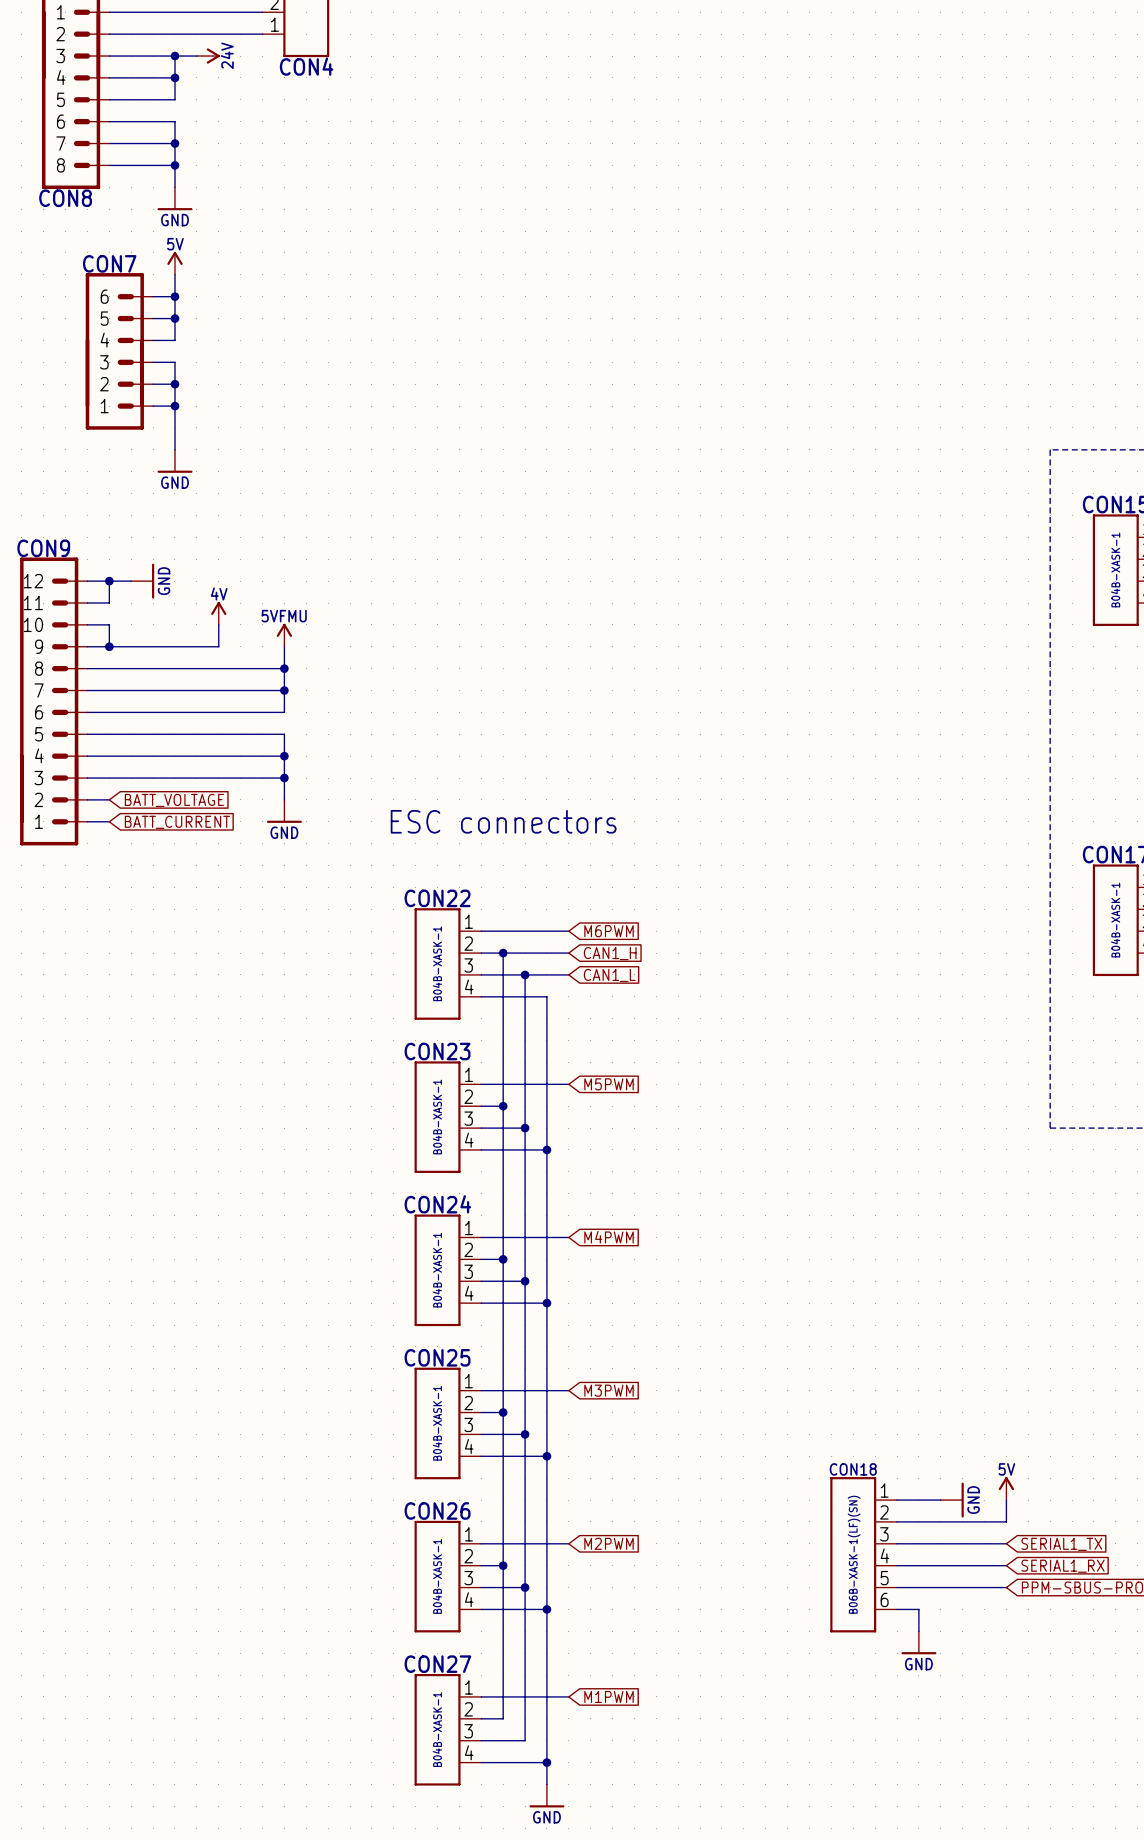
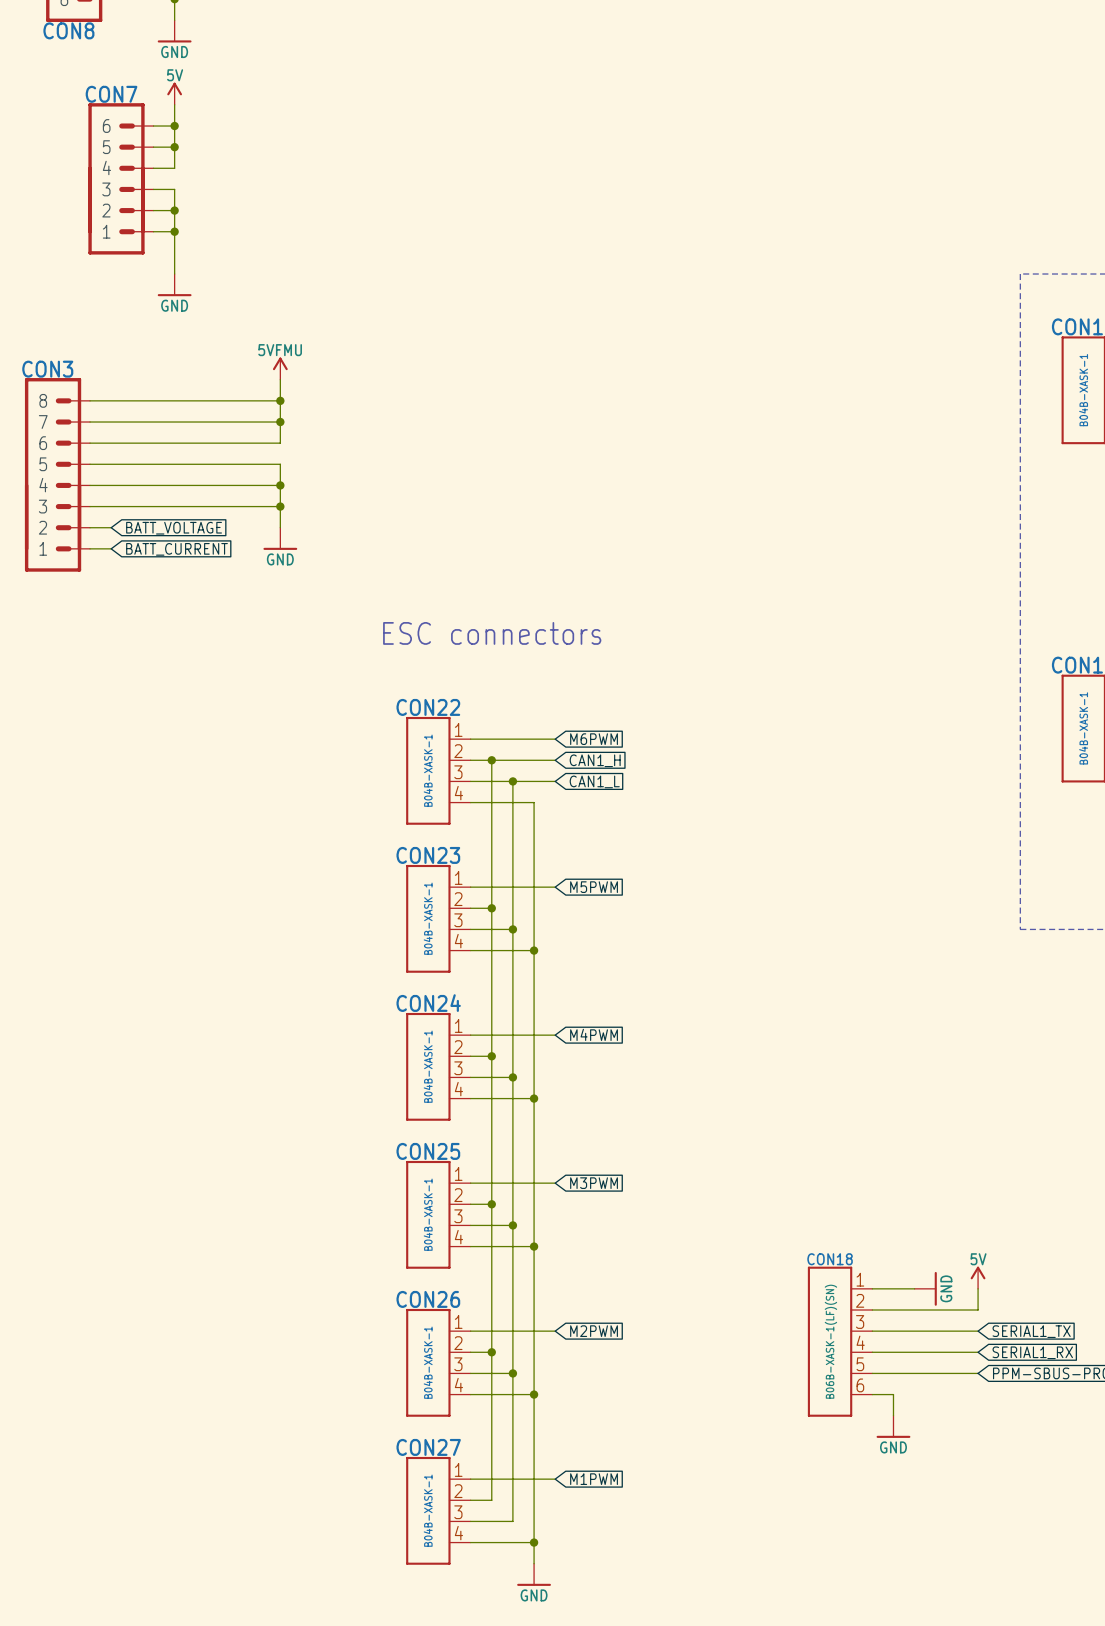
wire: (109, 581) (109, 603) -> (280, 422) (111, 422)
junction: (109, 581) -> none
wire: none -> (132, 400) (280, 400)
power symbol: GND (142, 581) -> none
junction: none -> (280, 400)
junction: none -> (280, 422)
power symbol: 4V (218, 613) -> none
wire: (109, 624) (109, 646) -> (111, 443) (280, 443) (280, 379)
wire: (218, 624) (218, 646) -> (280, 464) (216, 464)
power symbol position: 5VFMU (284, 635) -> 5VFMU (280, 368)
junction: (109, 646) -> none
CON3: none -> (57, 474)
CON9: (53, 701) -> none
wire: (109, 712) (284, 712) -> none
wire: (109, 734) (284, 734) (284, 799) -> none
wire: (87, 756) (284, 756) -> none
junction: (284, 756) -> none
wire: (87, 778) (284, 778) -> none
junction: (284, 778) -> none
wire: (87, 799) (109, 799) -> none
global label position: BATT_VOLTAGE (174, 800) -> BATT_VOLTAGE (174, 528)
power symbol position: GND (284, 811) -> GND (280, 538)
wire: (87, 821) (109, 821) -> none
global label position: BATT_CURRENT (177, 822) -> BATT_CURRENT (177, 549)

